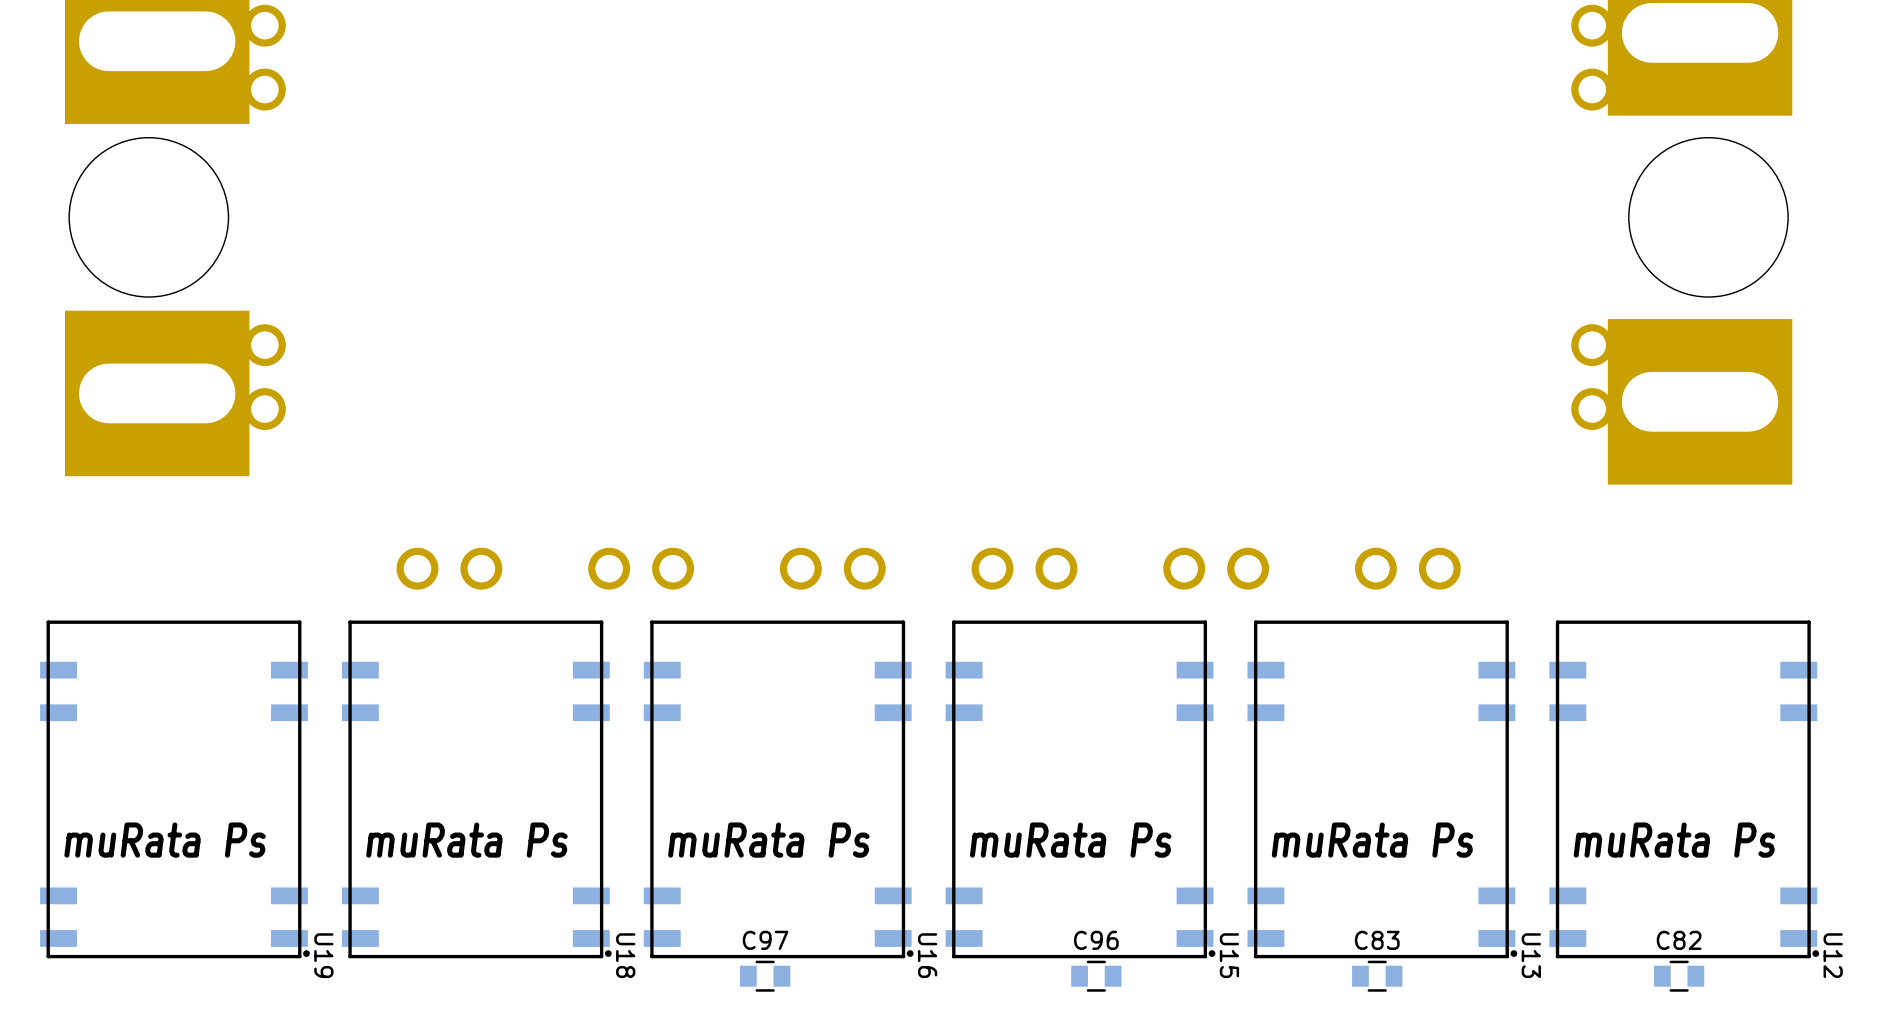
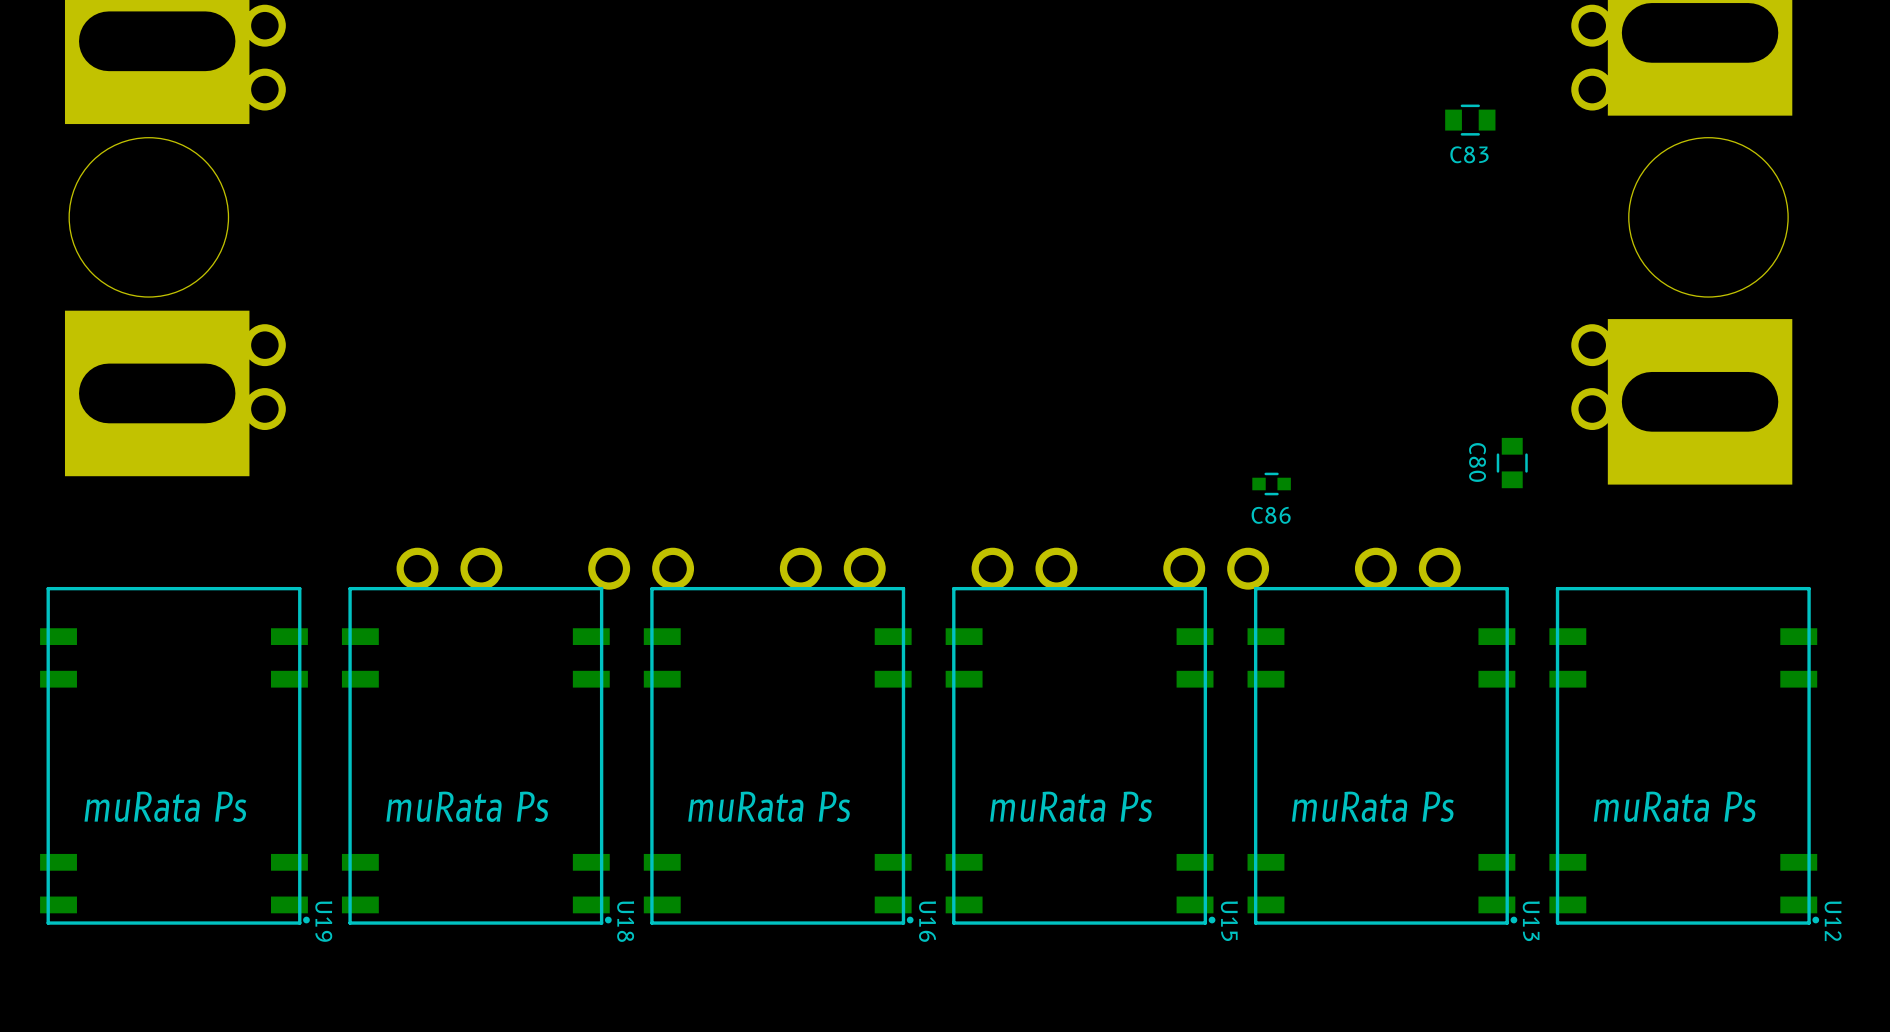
C80: none -> (1512, 463)
C86: none -> (1271, 484)
U19 position: (174, 789) -> (174, 755)
U18 position: (476, 789) -> (476, 755)
U16 position: (778, 789) -> (778, 755)
U15 position: (1080, 789) -> (1080, 755)
U13 position: (1382, 789) -> (1382, 755)
U12 position: (1684, 789) -> (1684, 755)
C83 name position: C83 (1377, 940) -> C83 (1469, 154)
C97: (765, 976) -> none
C96: (1096, 976) -> none
C83 position: (1377, 976) -> (1470, 120)
C82: (1679, 976) -> none

